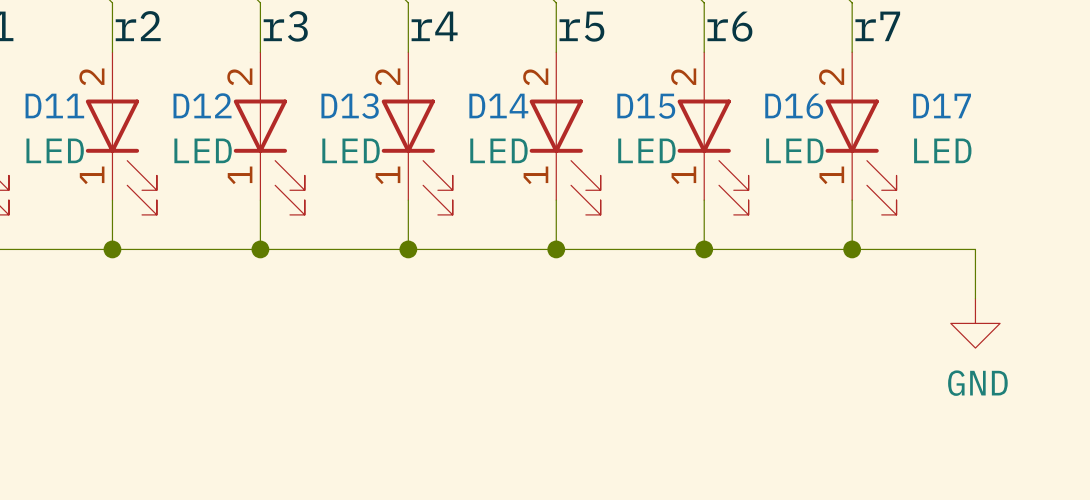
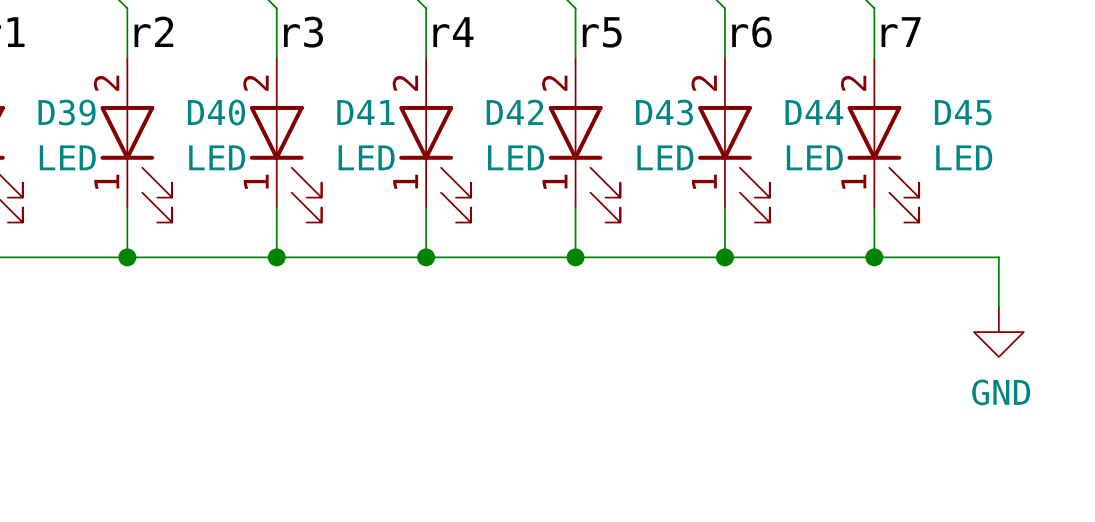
D12 name: D12 (202, 105) -> D40 (216, 112)
D11 name: D11 (54, 106) -> D39 (67, 112)
D13 name: D13 (350, 106) -> D41 (365, 112)
D14 name: D14 (498, 106) -> D42 (514, 112)
D15 name: D15 (646, 106) -> D43 (664, 112)
D16 name: D16 (794, 106) -> D44 (814, 112)
D17 name: D17 (942, 106) -> D45 (963, 112)

